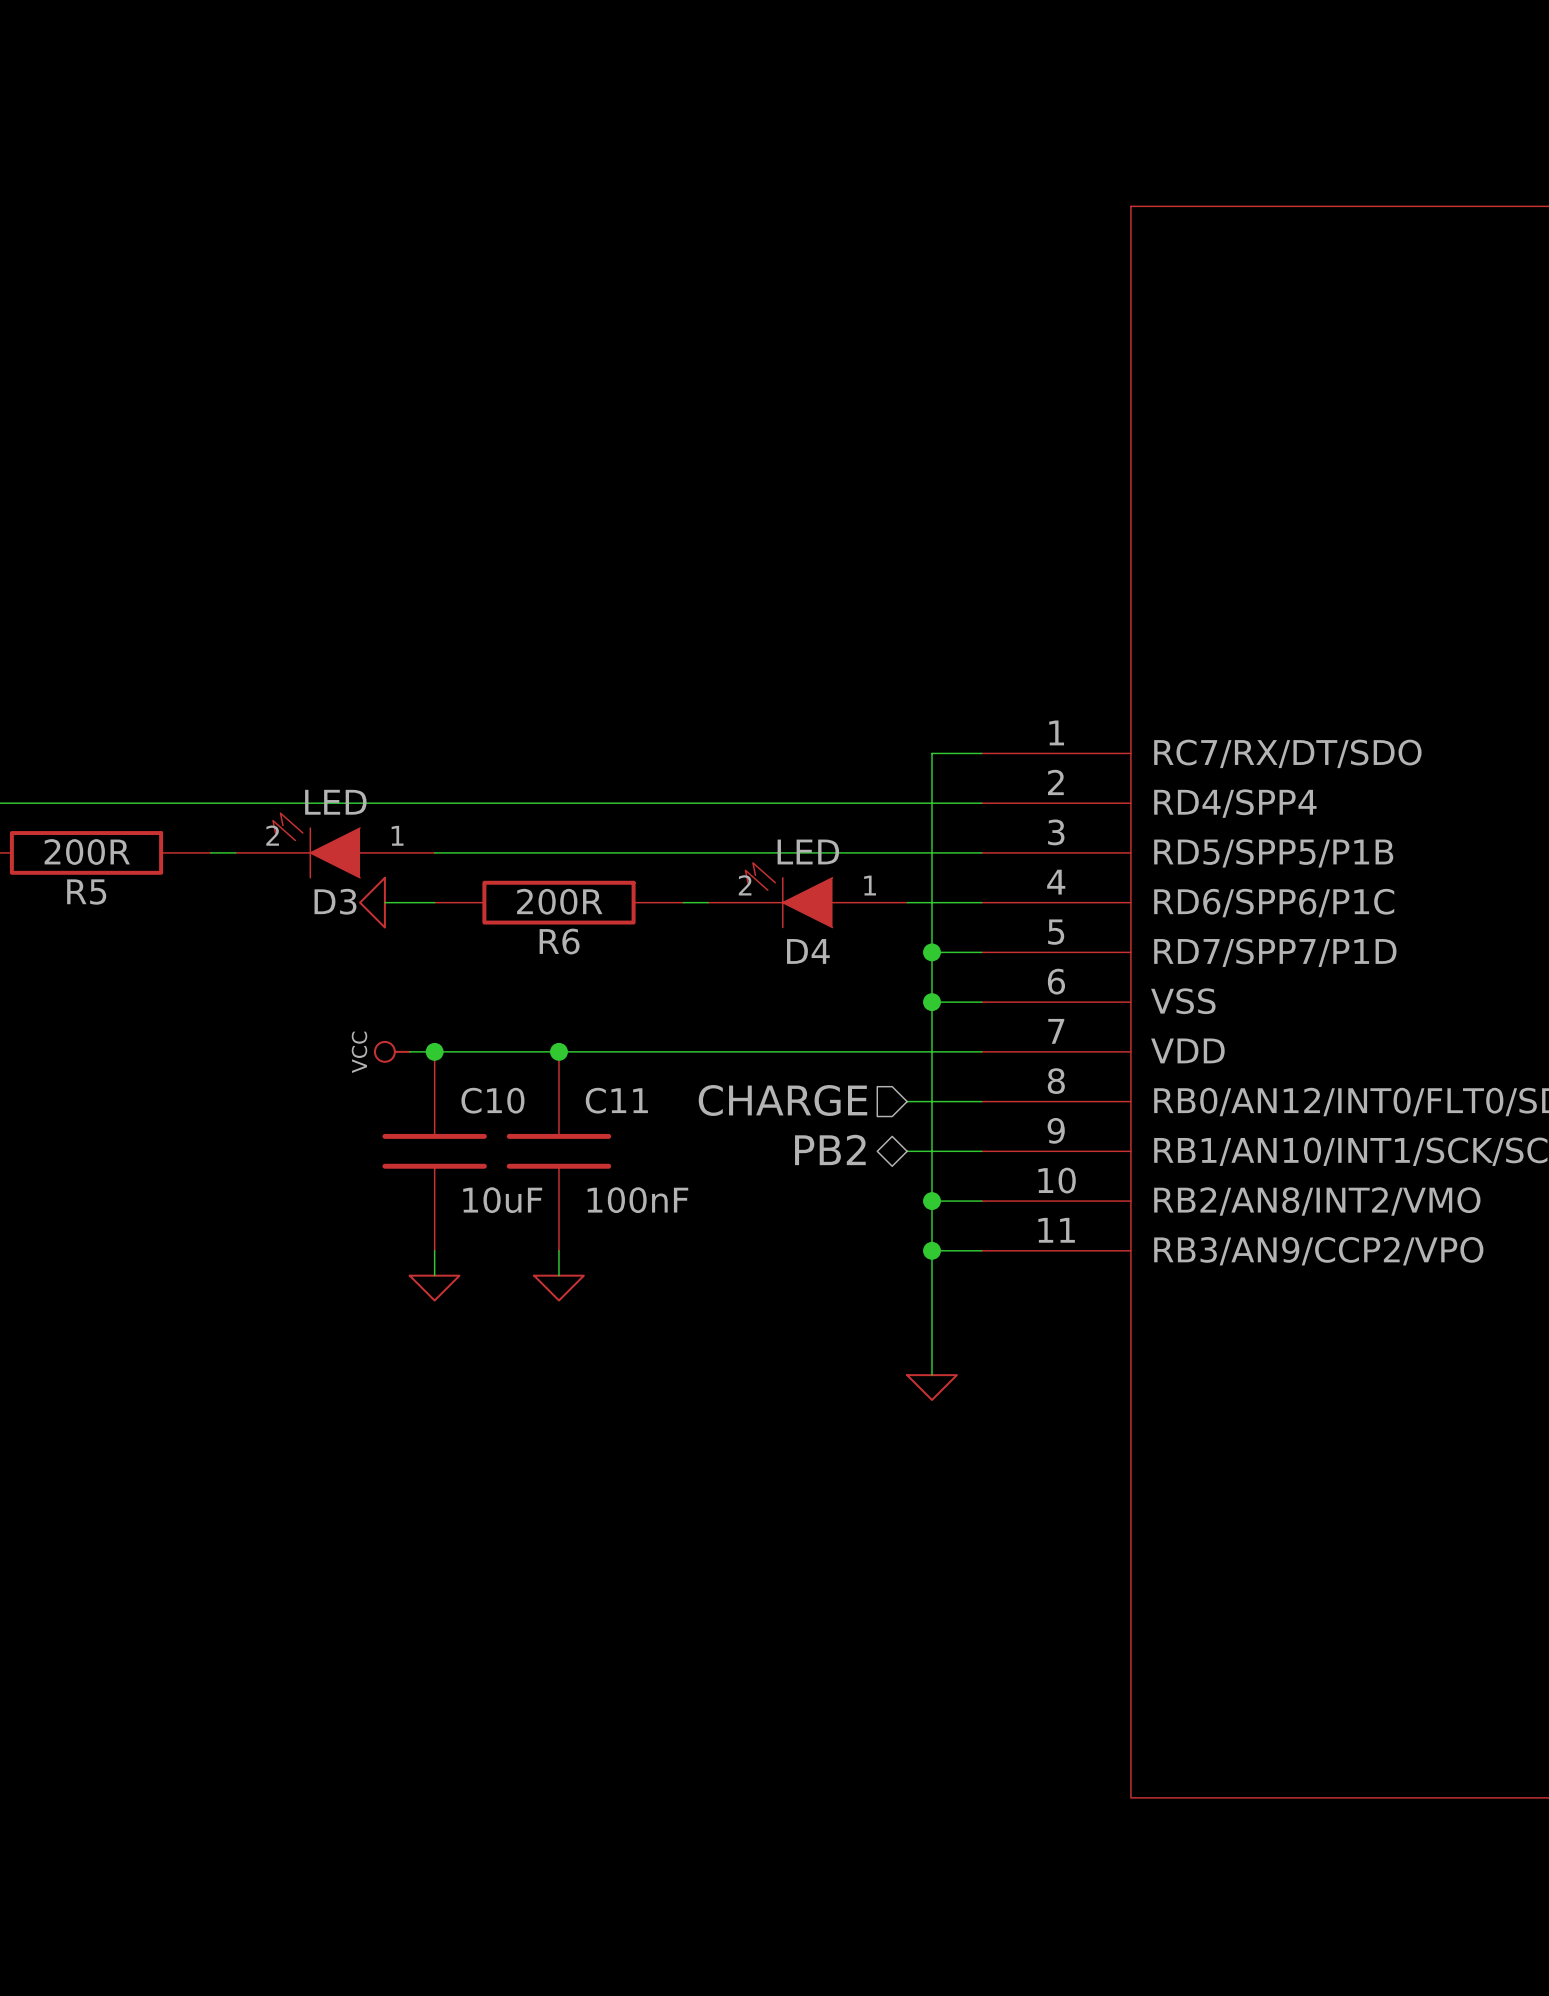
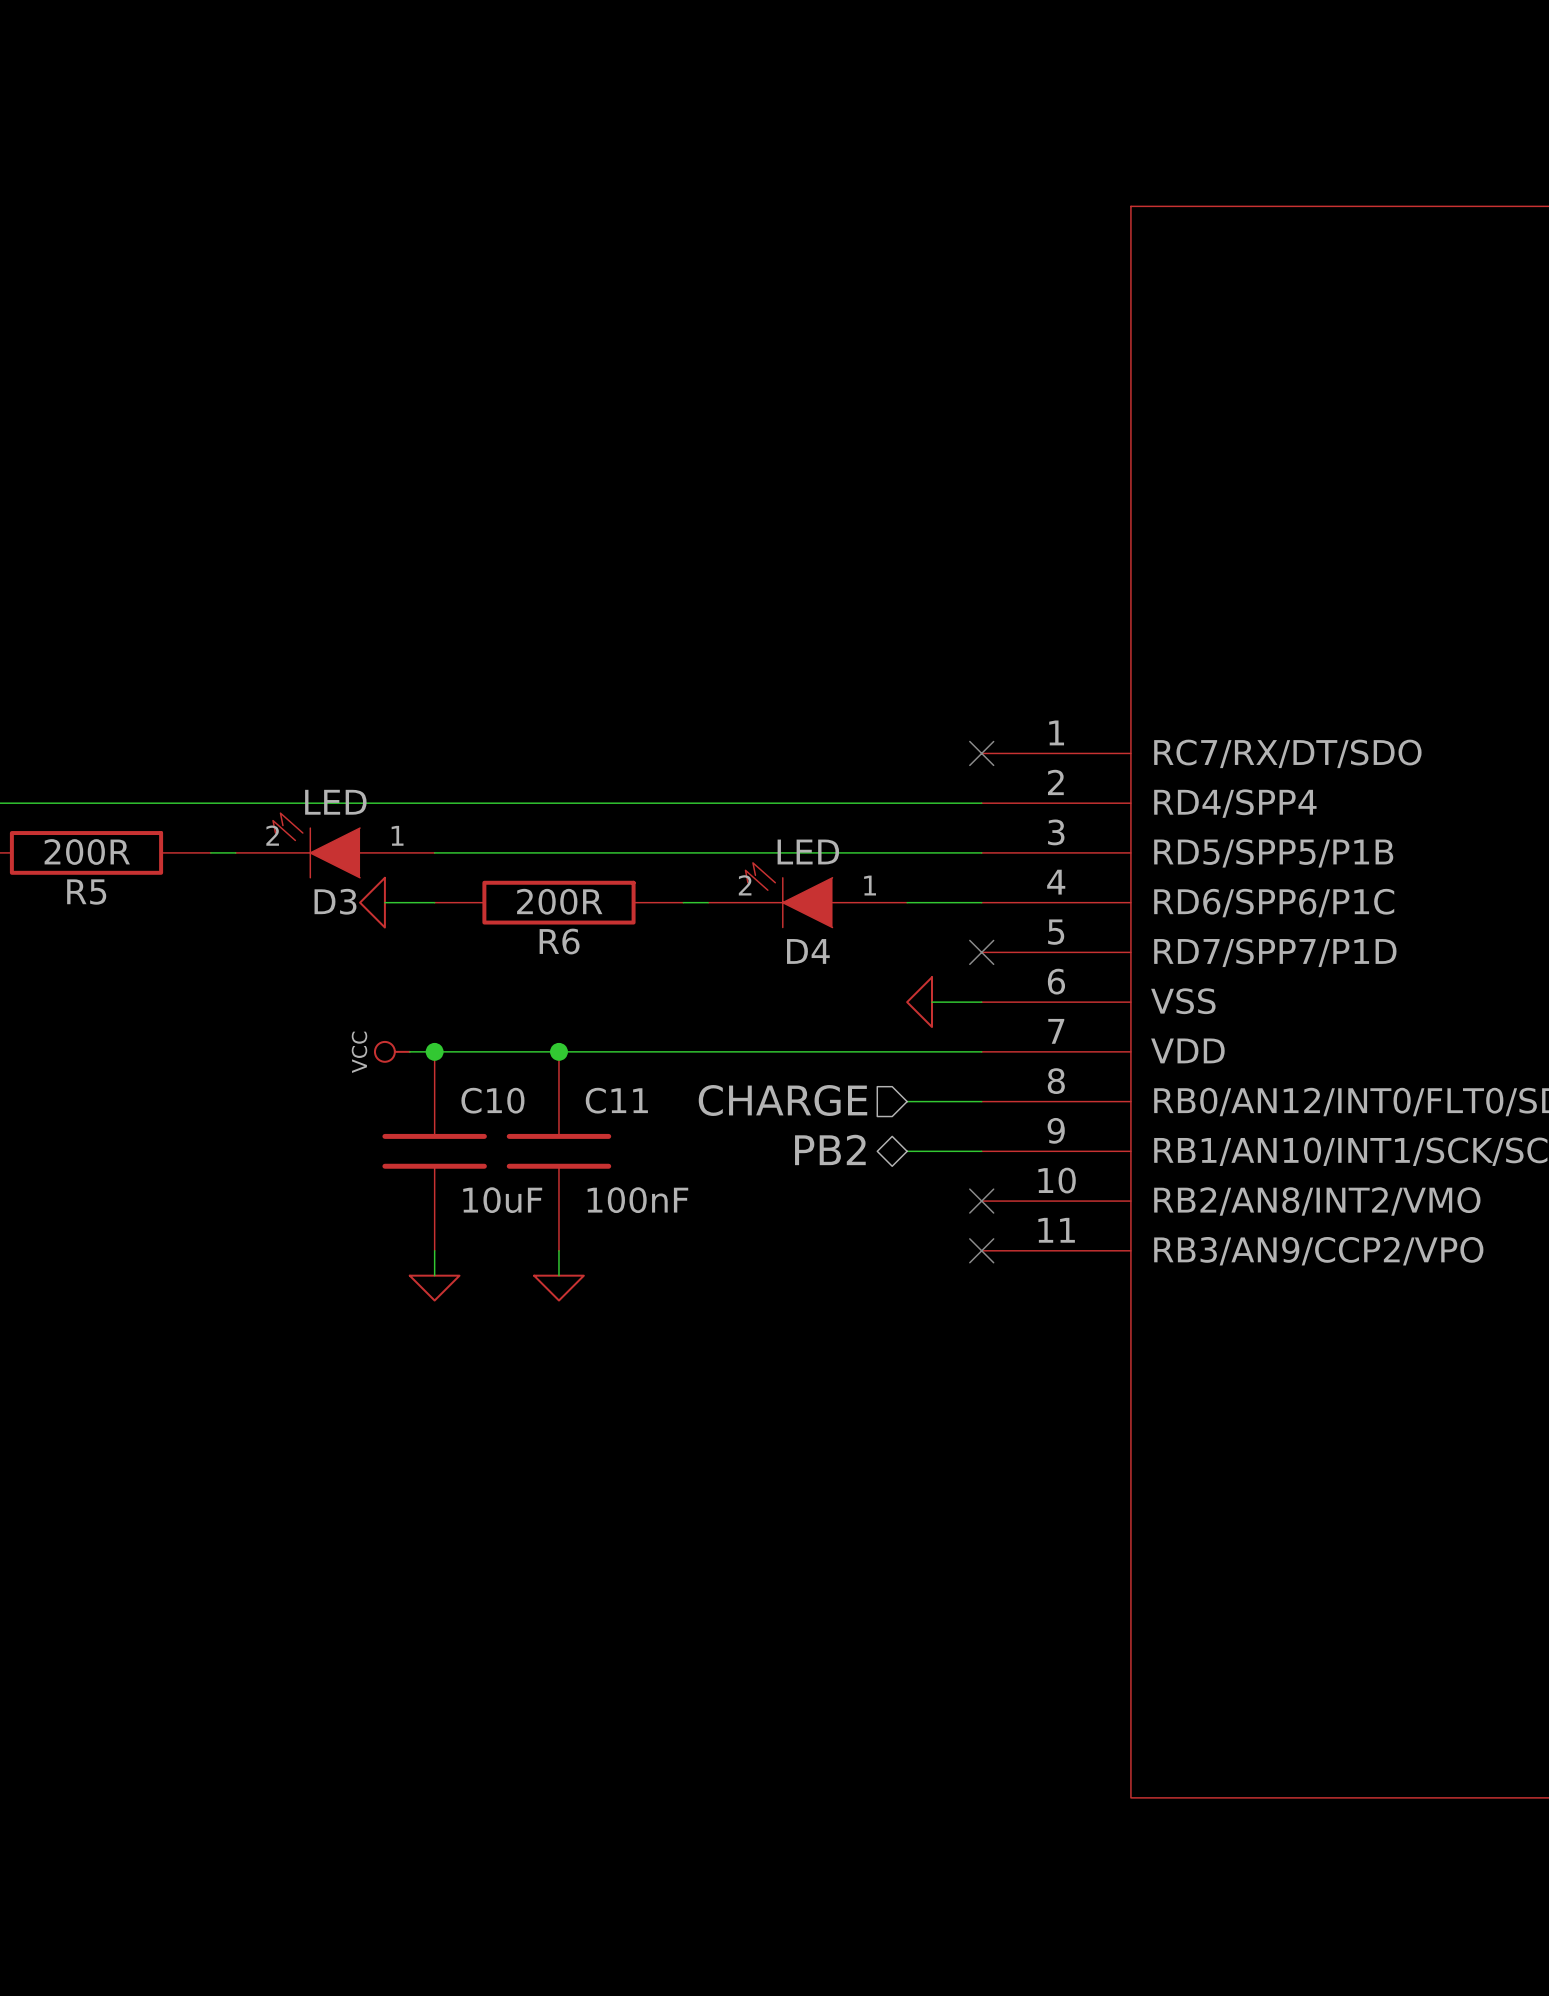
wire: (981, 753) (931, 753) (931, 1375) -> none
no-connect mark: none -> (981, 753)
wire: (931, 952) (981, 952) -> none
junction: (931, 952) -> none
no-connect mark: none -> (981, 952)
junction: (931, 1002) -> none
wire: (931, 1201) (981, 1201) -> none
junction: (931, 1201) -> none
no-connect mark: none -> (981, 1201)
wire: (931, 1250) (981, 1250) -> none
junction: (931, 1250) -> none
no-connect mark: none -> (981, 1250)
power symbol rotation: 0° (931, 1387) -> 90° clockwise (919, 1002)
power symbol position: (931, 1387) -> (919, 1002)

